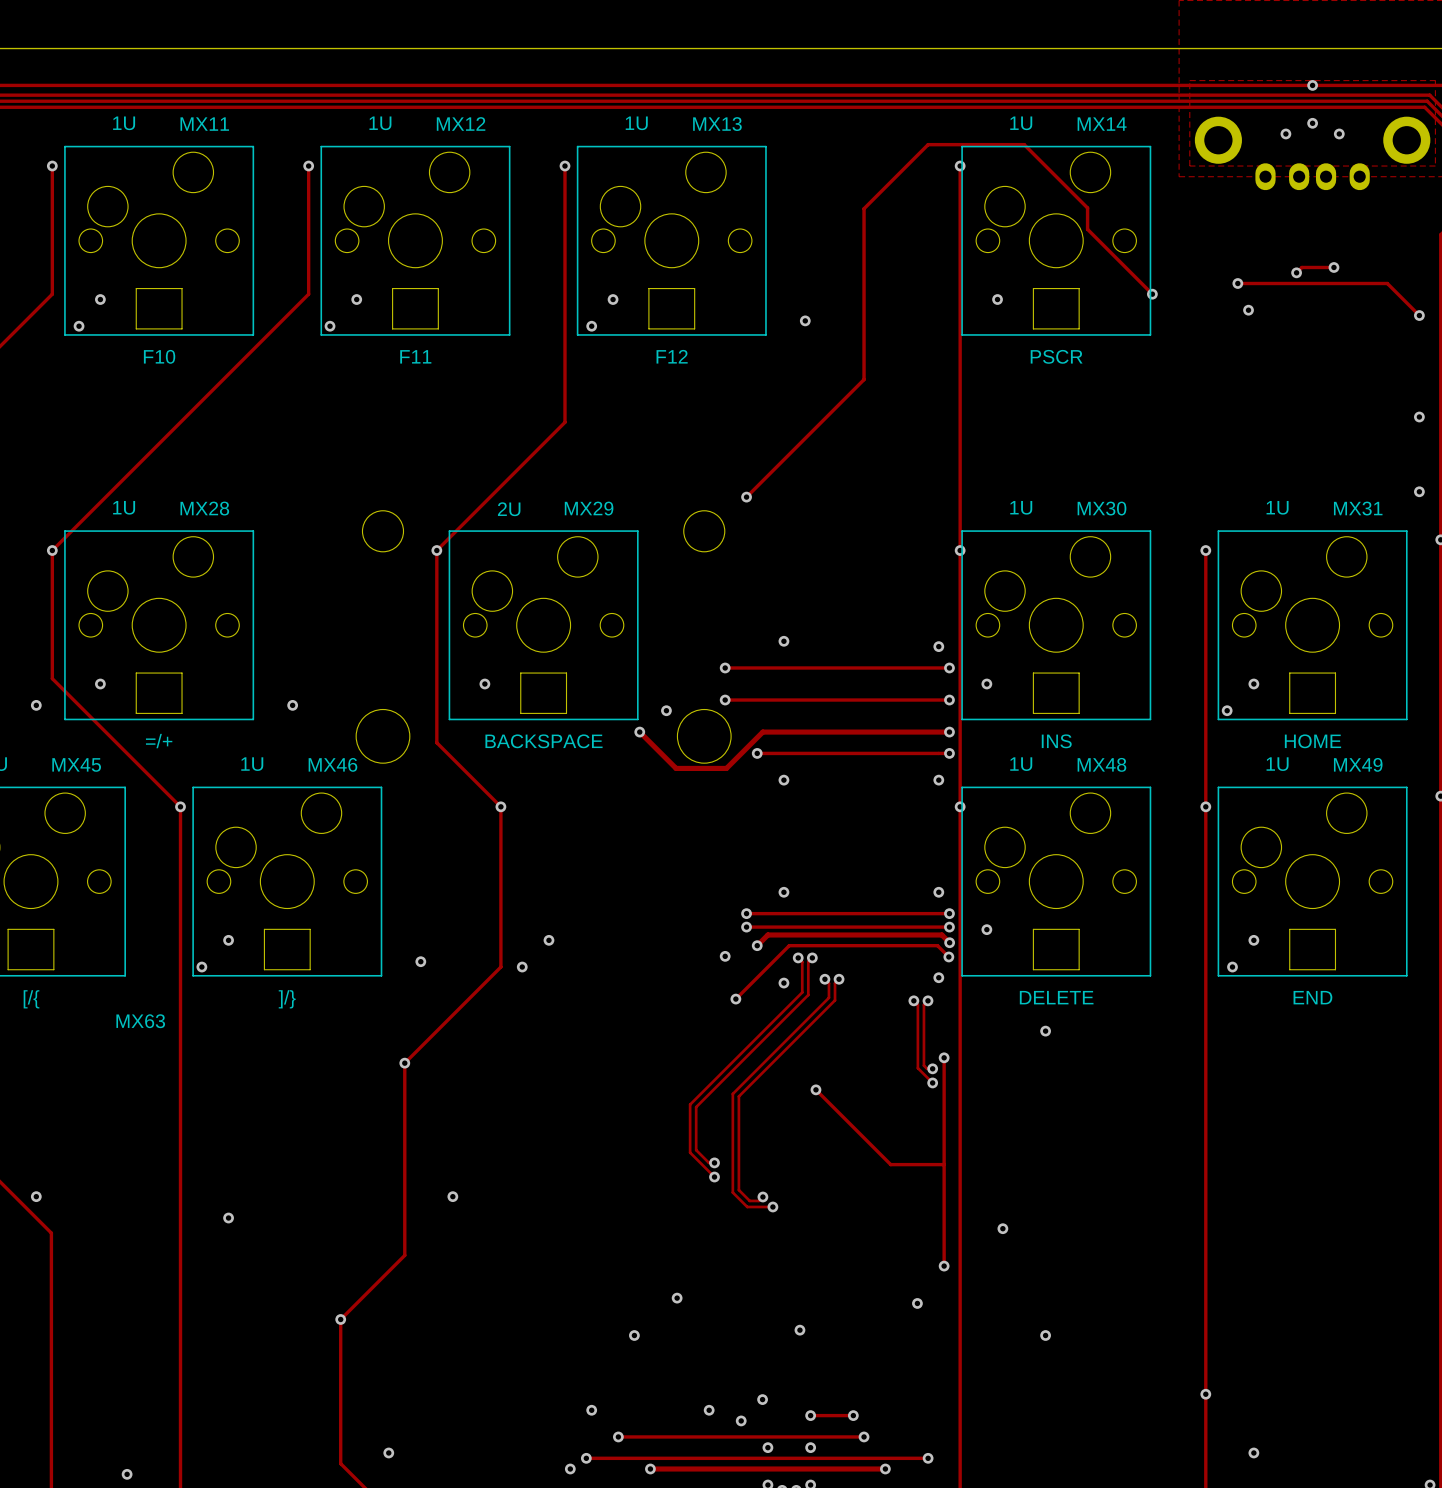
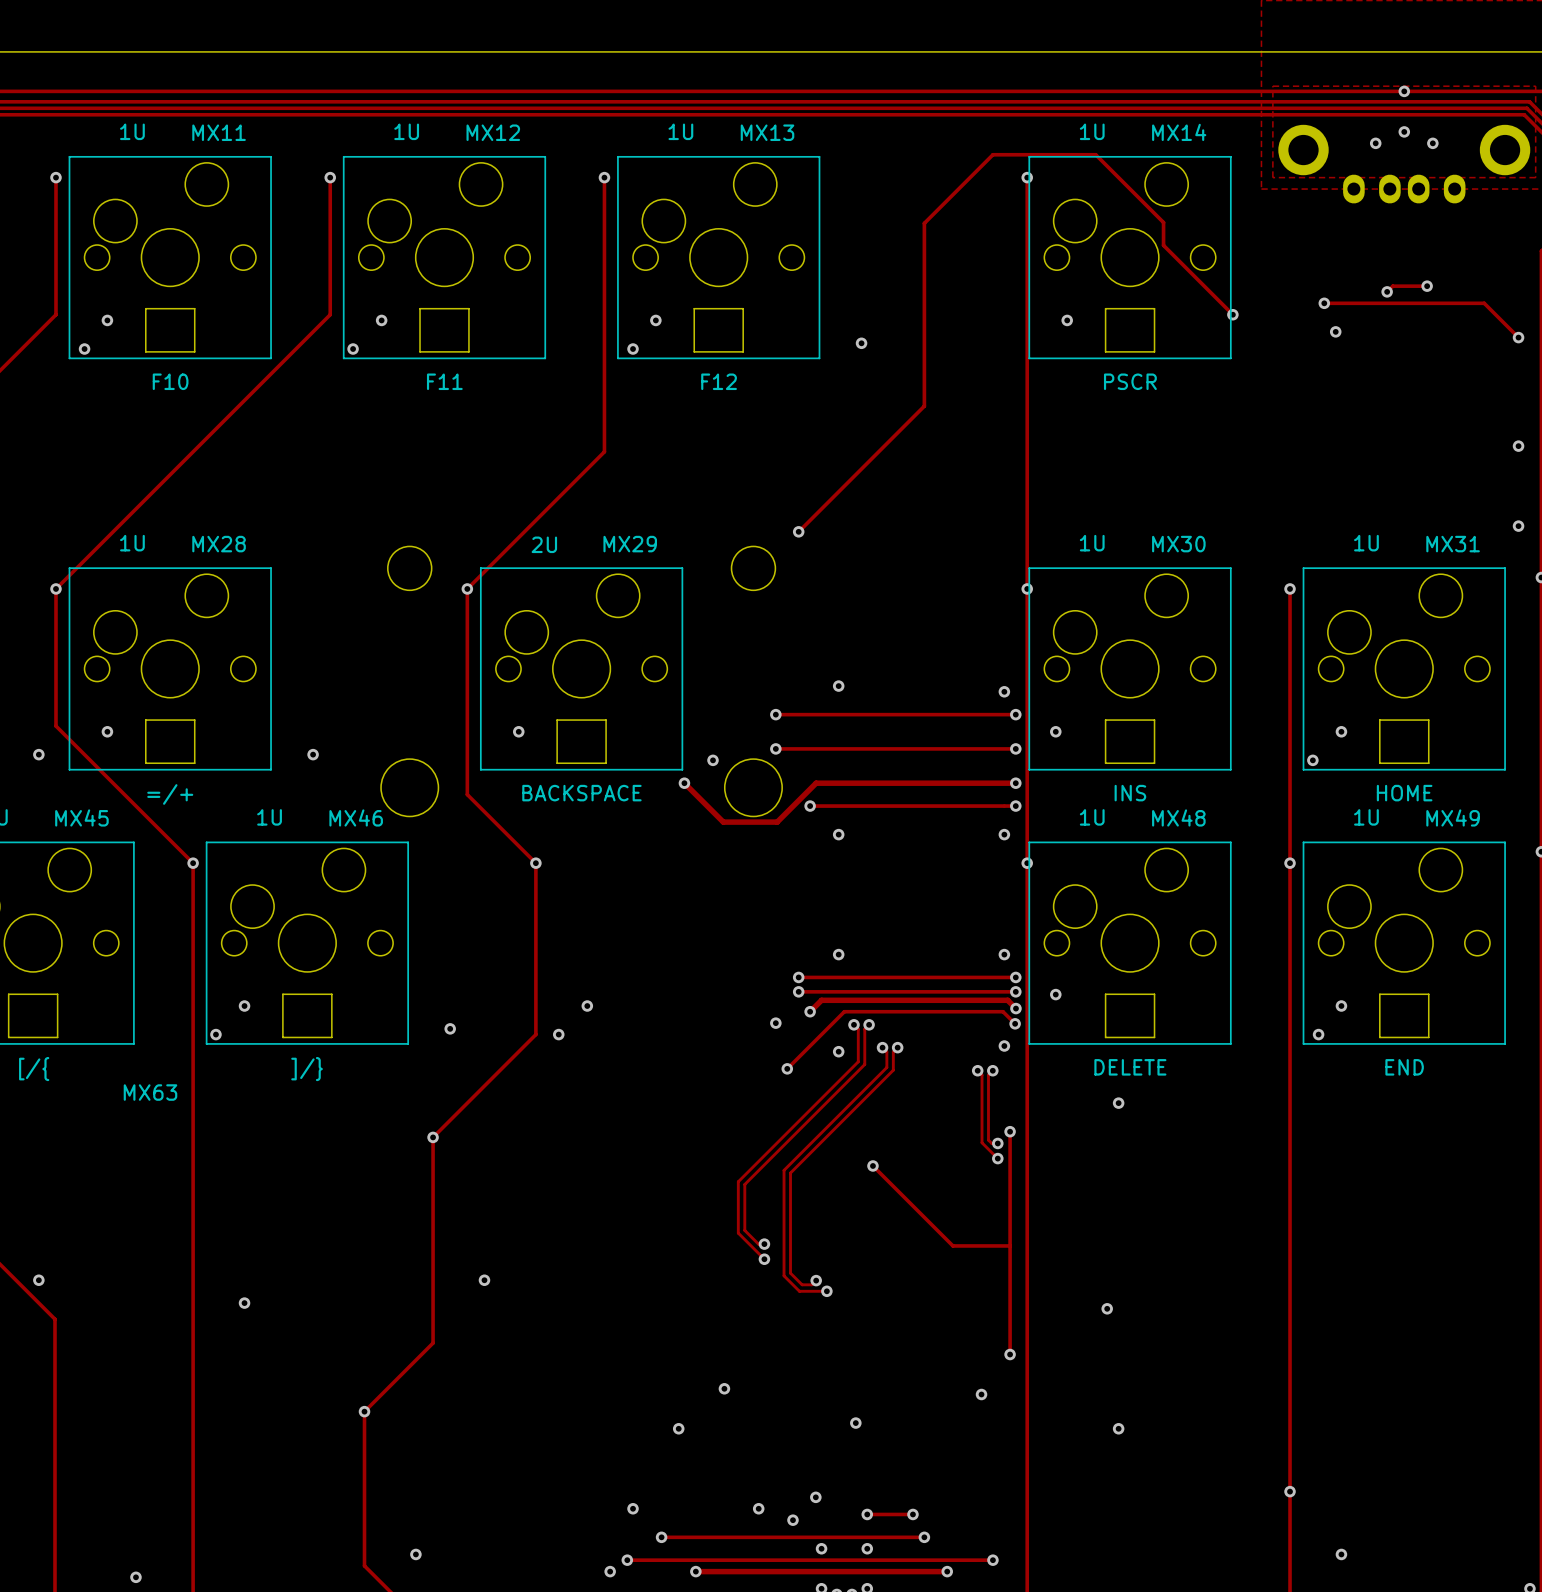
via position: (1002, 1228) -> (1107, 1308)

